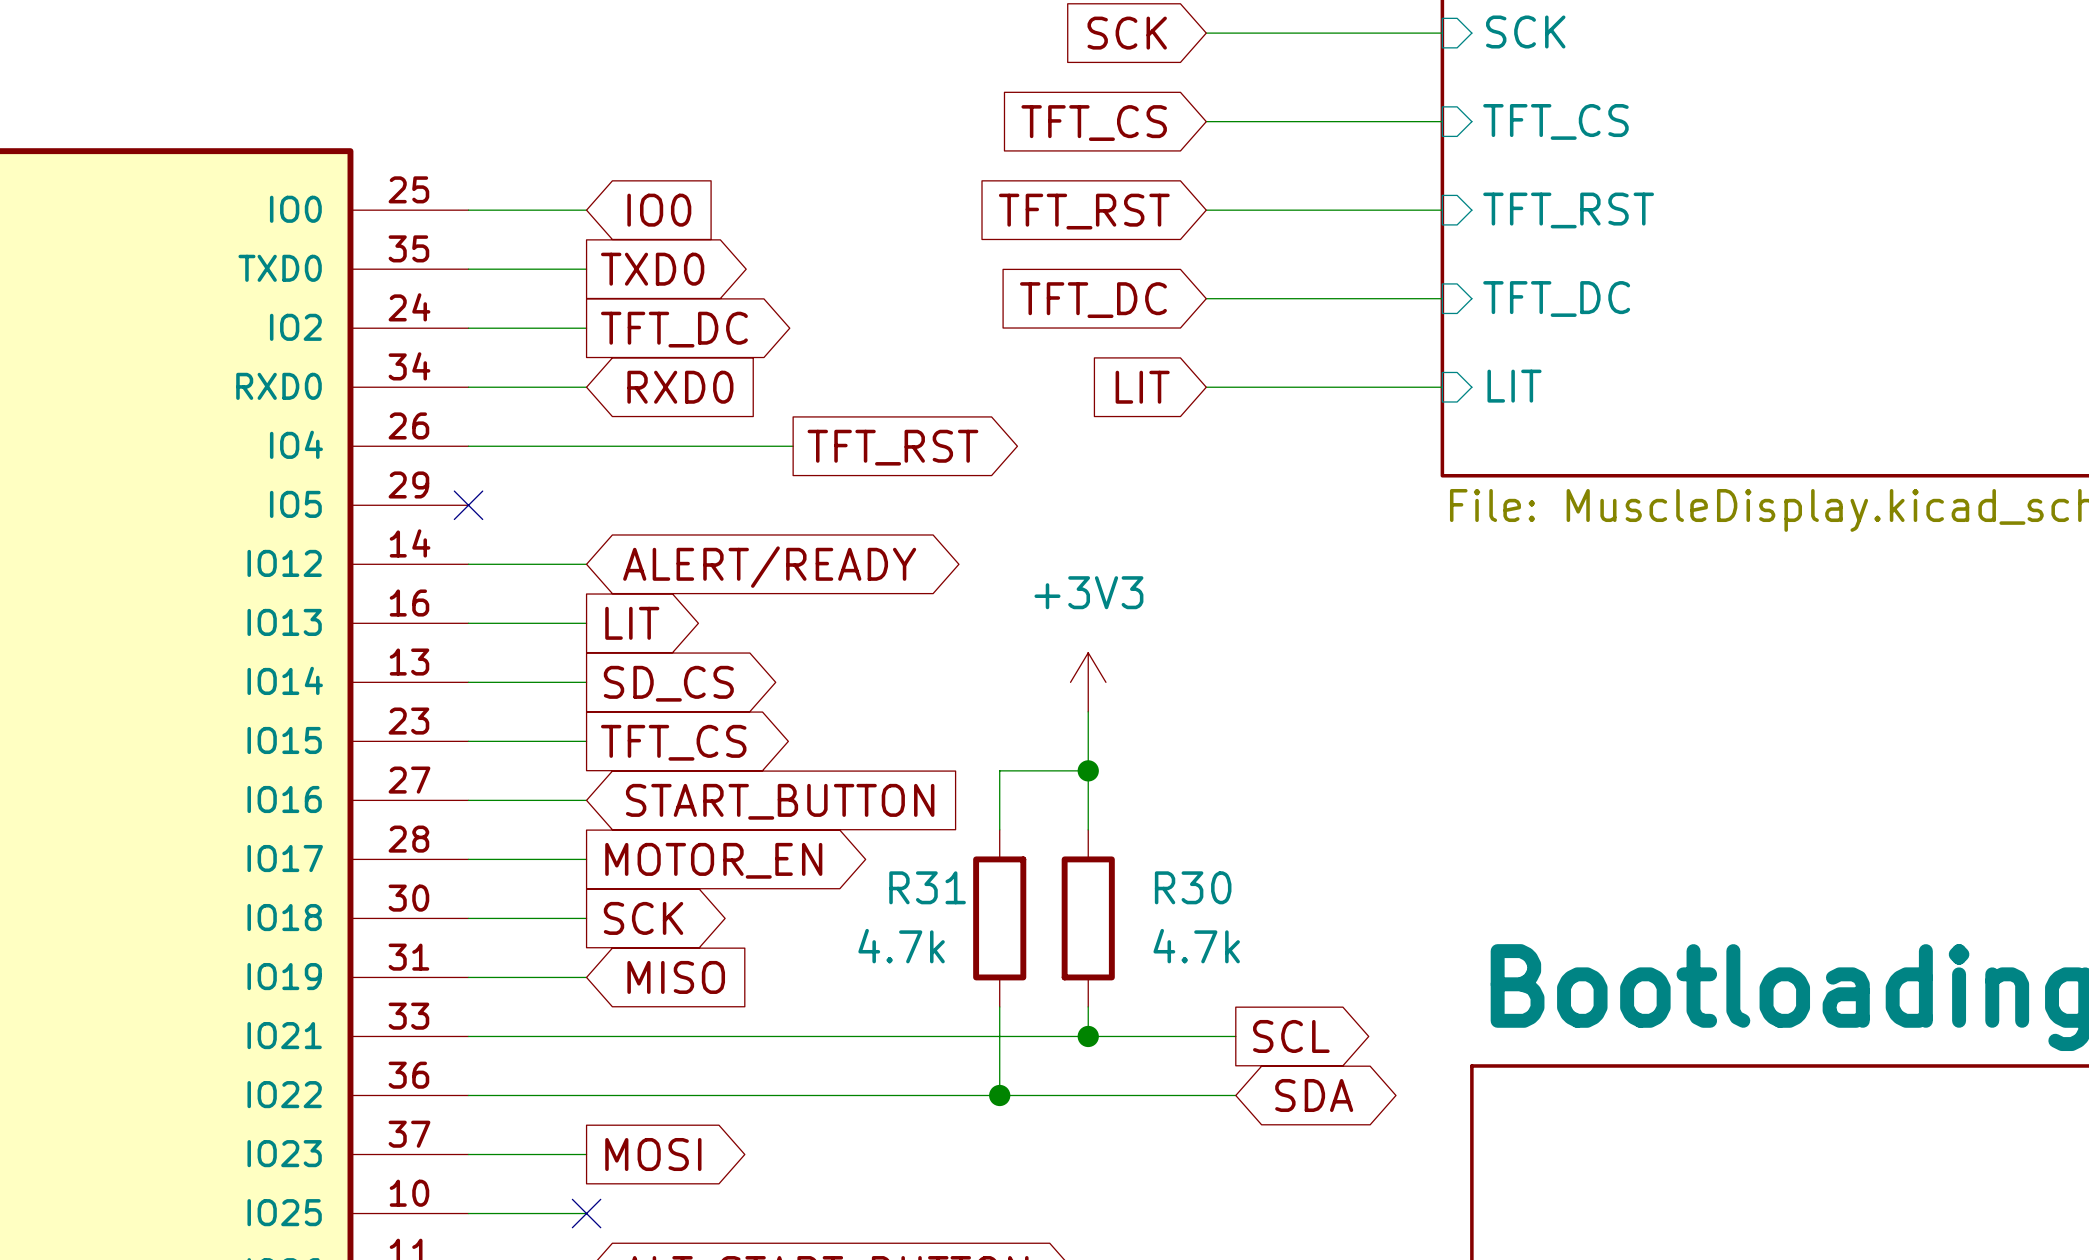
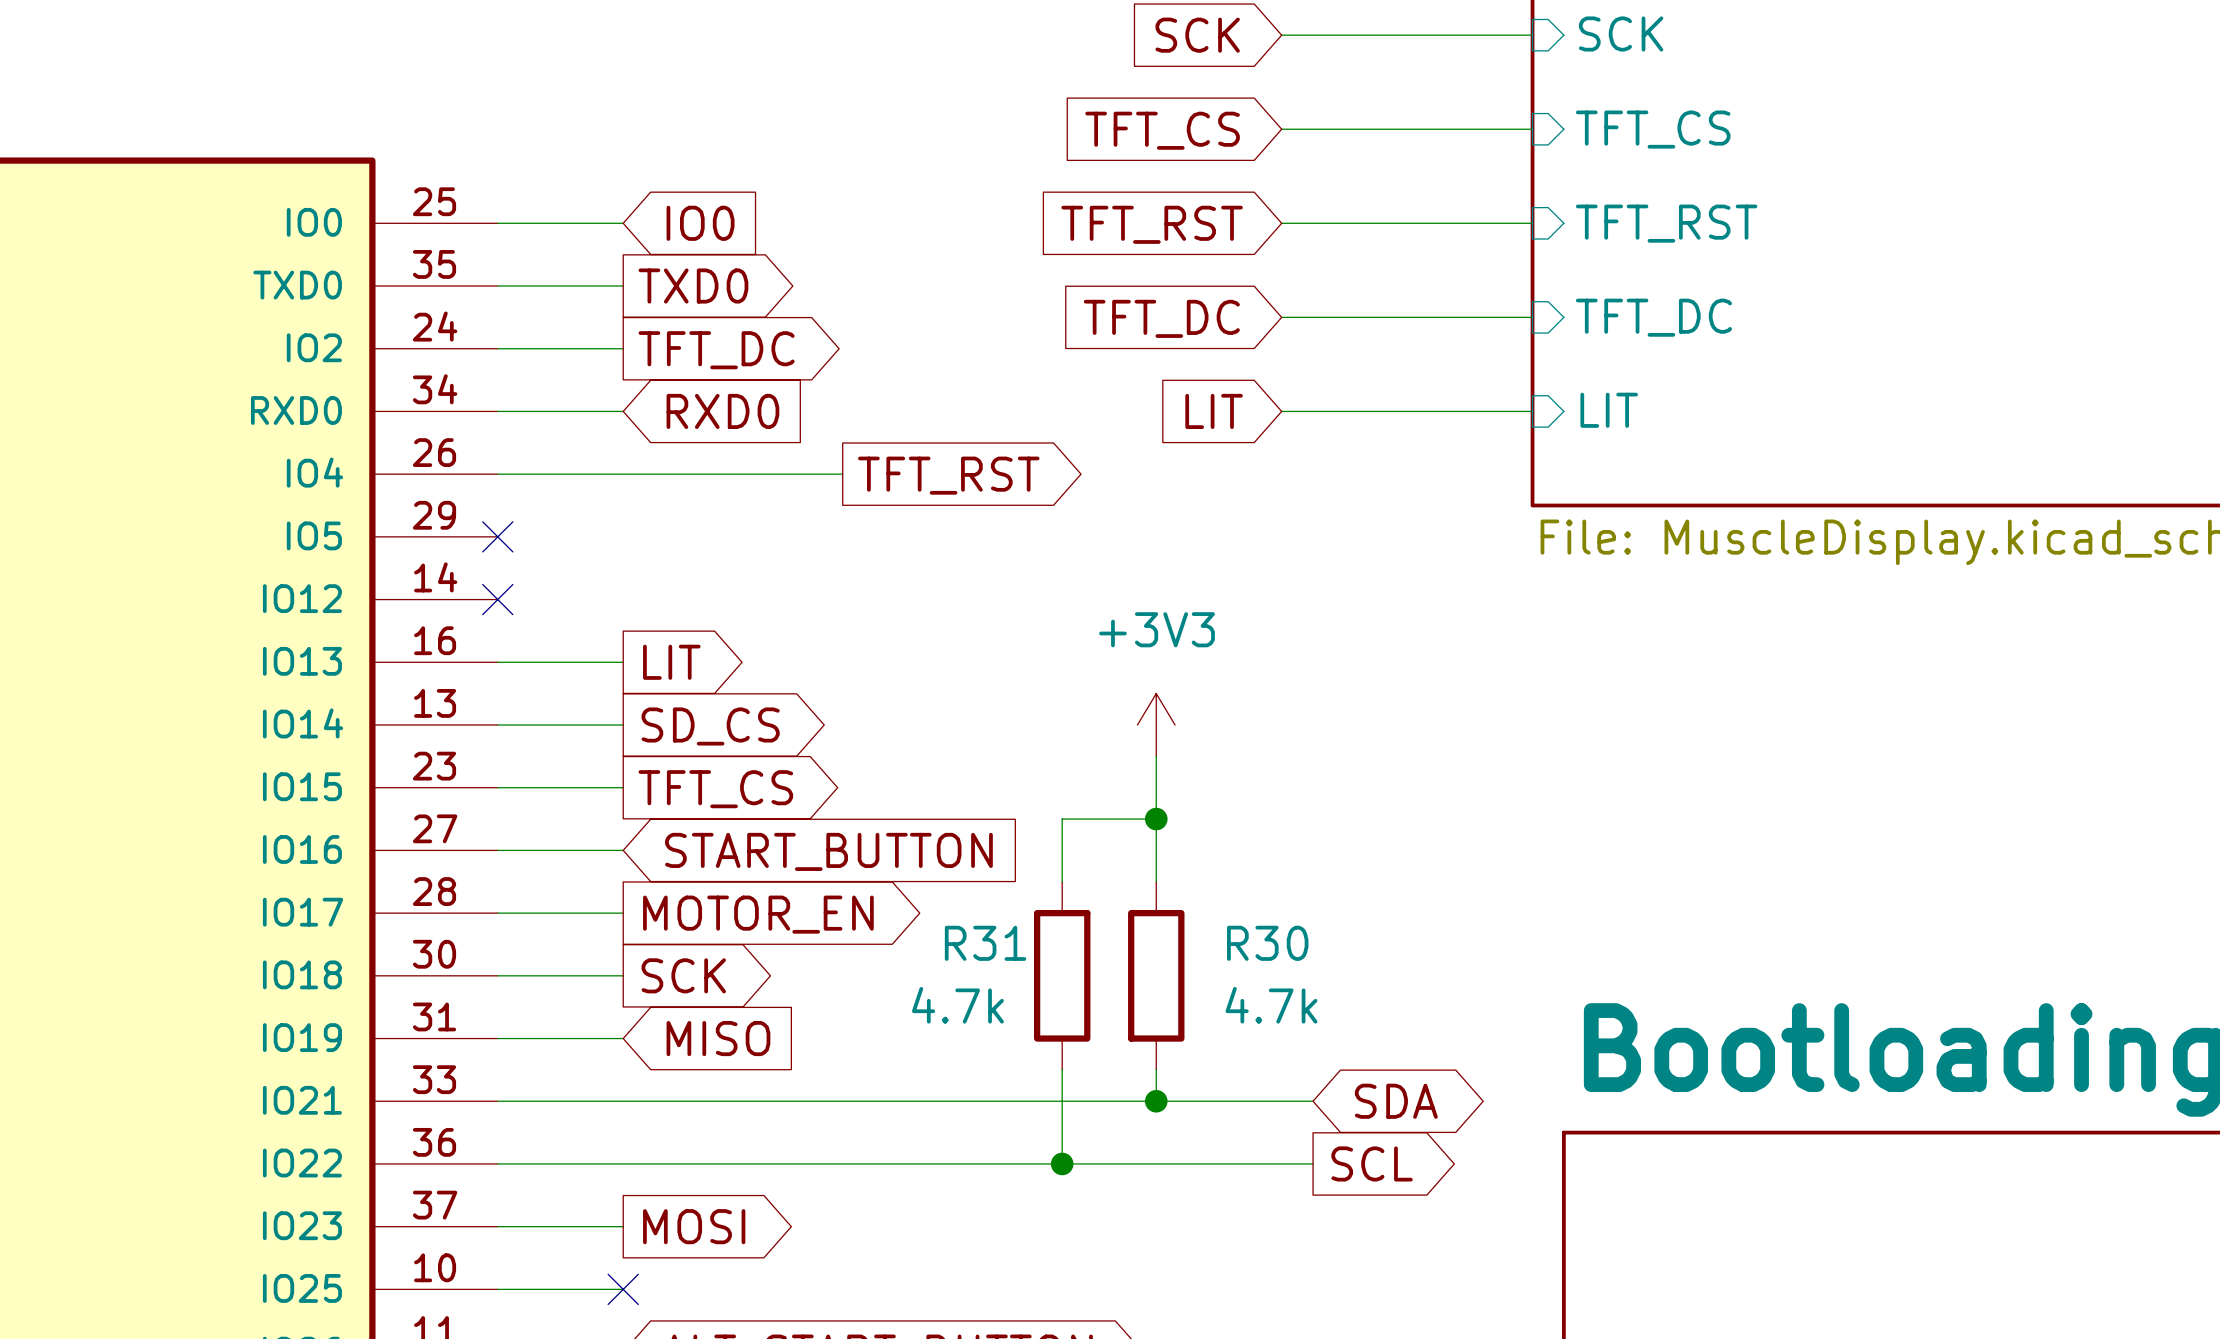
wire: (468, 564) (586, 564) -> none
no-connect mark: none -> (497, 599)
global label: ALERT/READY (769, 567) -> none
global label shape: output (1291, 1036) -> bidirectional (1396, 1101)
global label: SCL (1291, 1036) -> SDA (1396, 1101)
global label shape: bidirectional (1314, 1095) -> output (1372, 1163)
global label: SDA (1314, 1095) -> SCL (1372, 1163)

